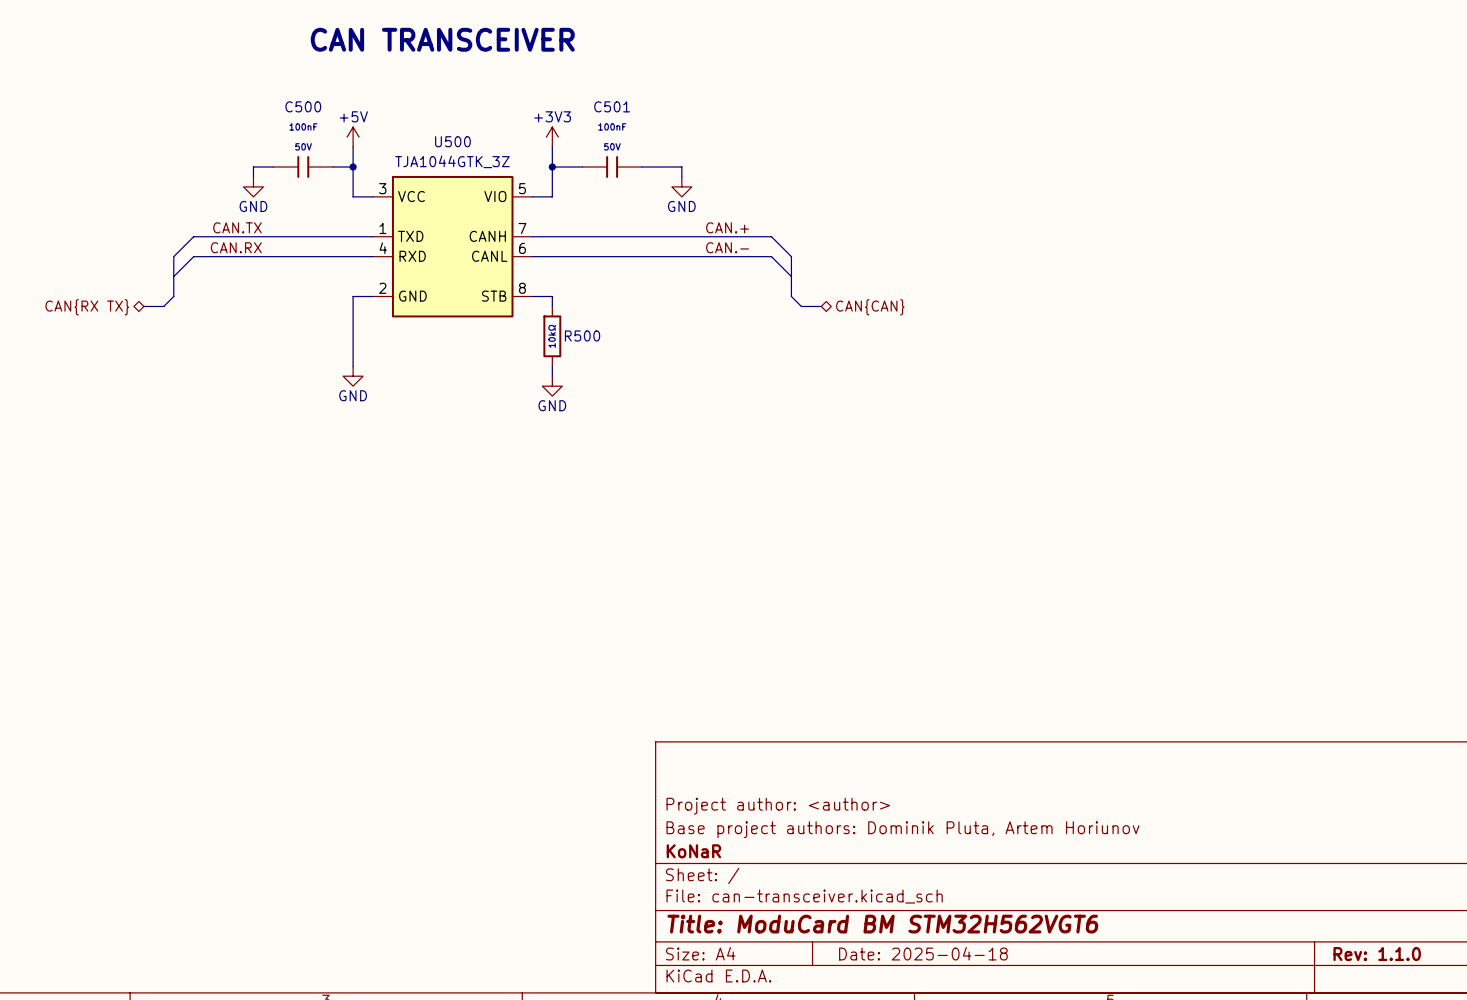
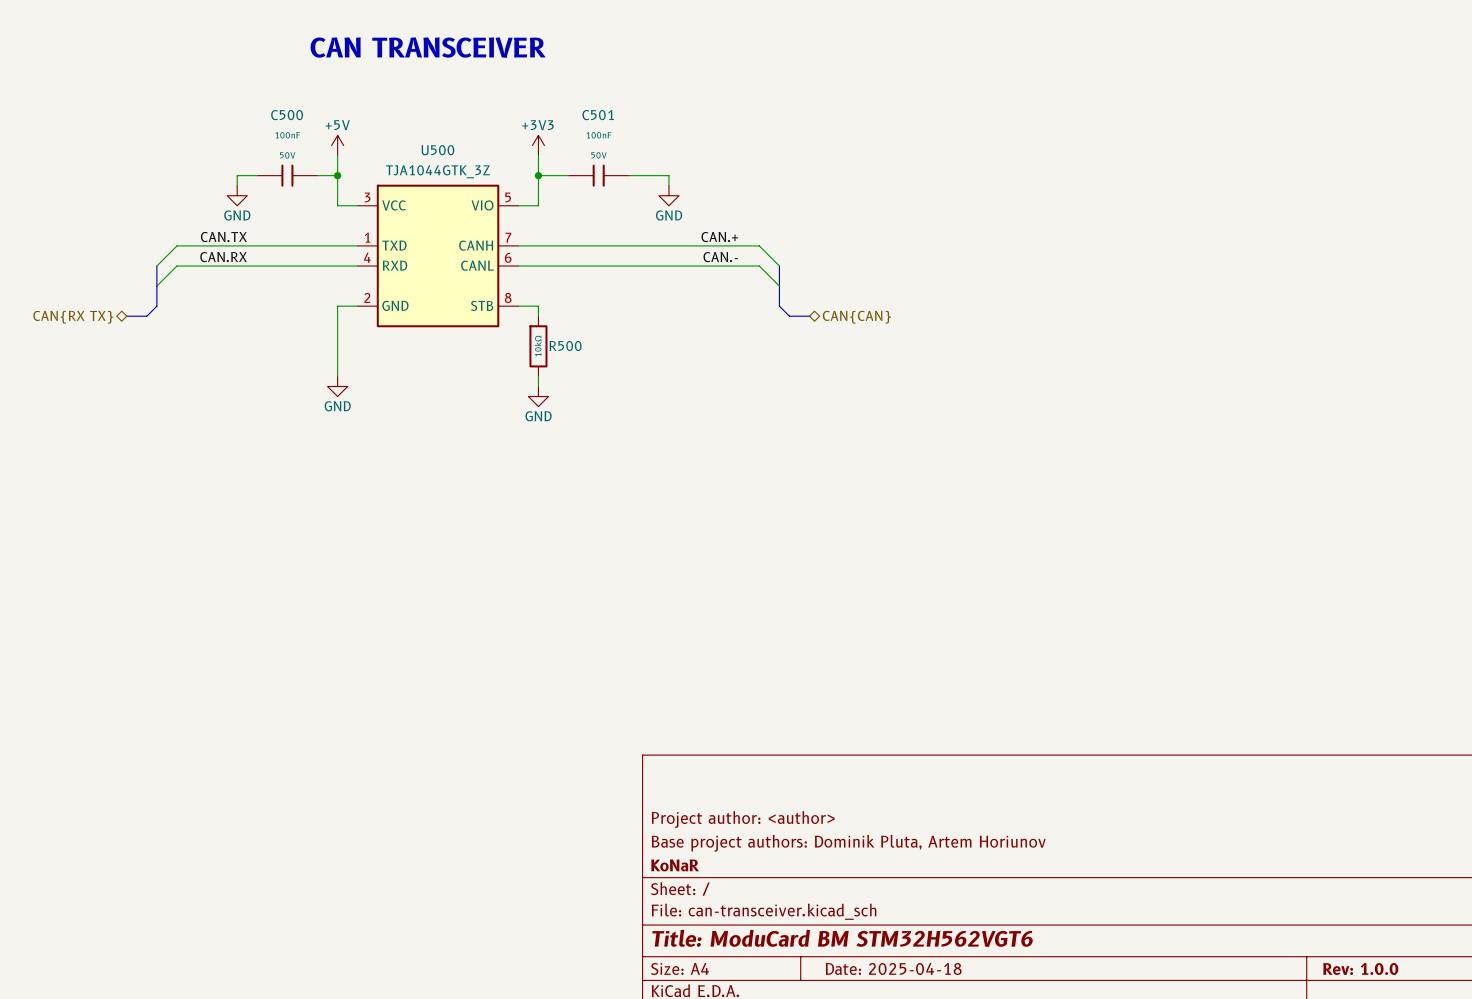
title block: Rev: 1.1.0 (1377, 954) -> Rev: 1.0.0 (1360, 969)

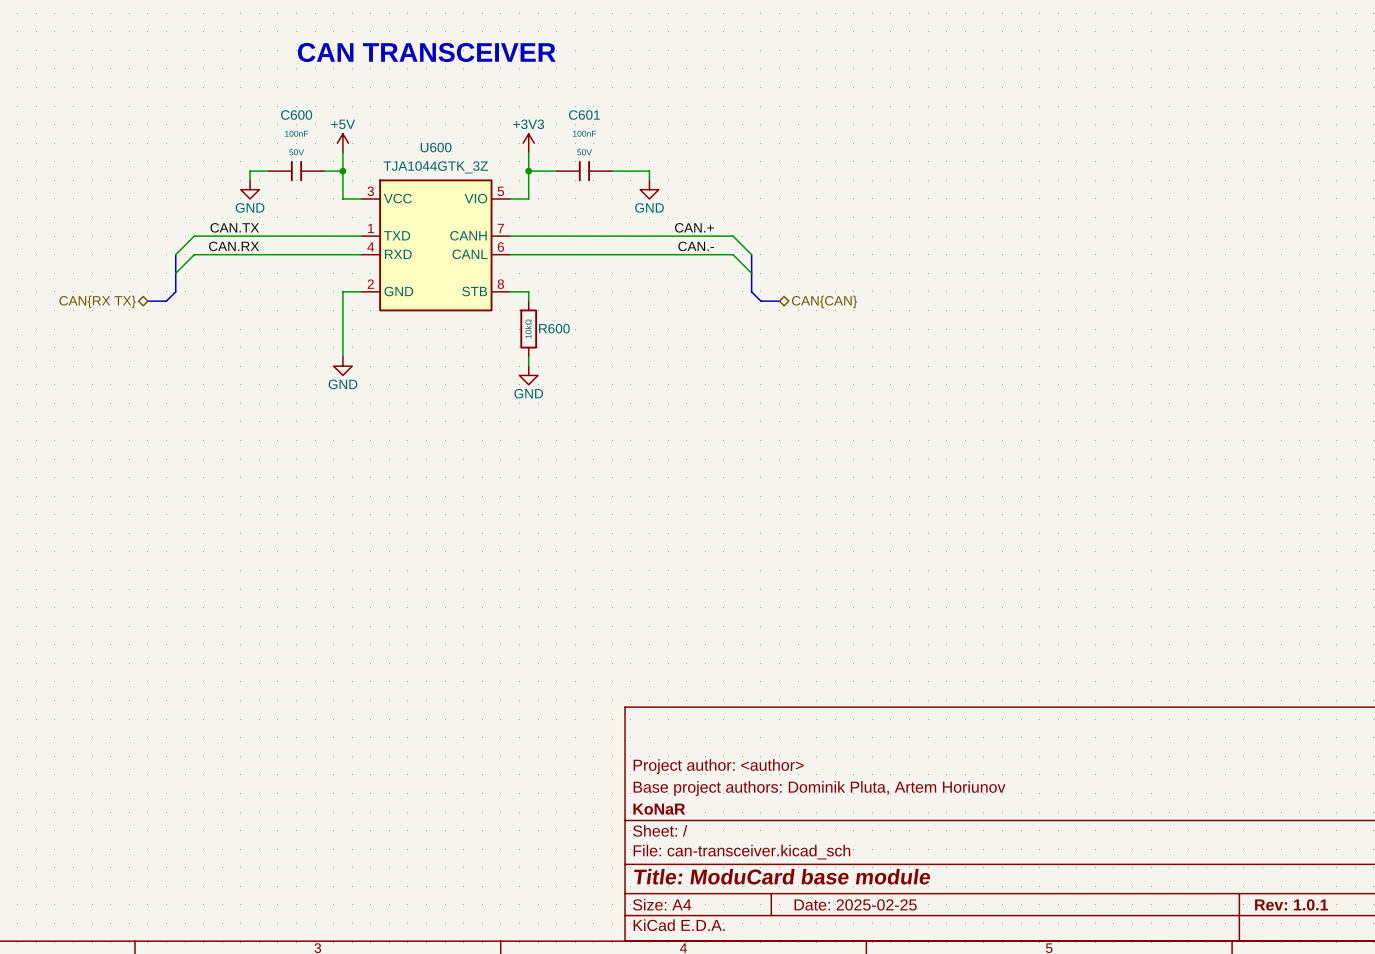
C500 name: C500 (287, 115) -> C600 (296, 115)
C501 name: C501 (598, 115) -> C601 (584, 115)
U500 name: U500 (437, 150) -> U600 (436, 147)
R500 name: R500 (565, 346) -> R600 (554, 328)
title block: Title: ModuCard BM STM32H562VGT6 (842, 938) -> Title: ModuCard base module (782, 876)
title block: Date: 2025-04-18 (893, 968) -> Date: 2025-02-25 (855, 904)
title block: Rev: 1.0.0 (1360, 969) -> Rev: 1.0.1 (1291, 904)

